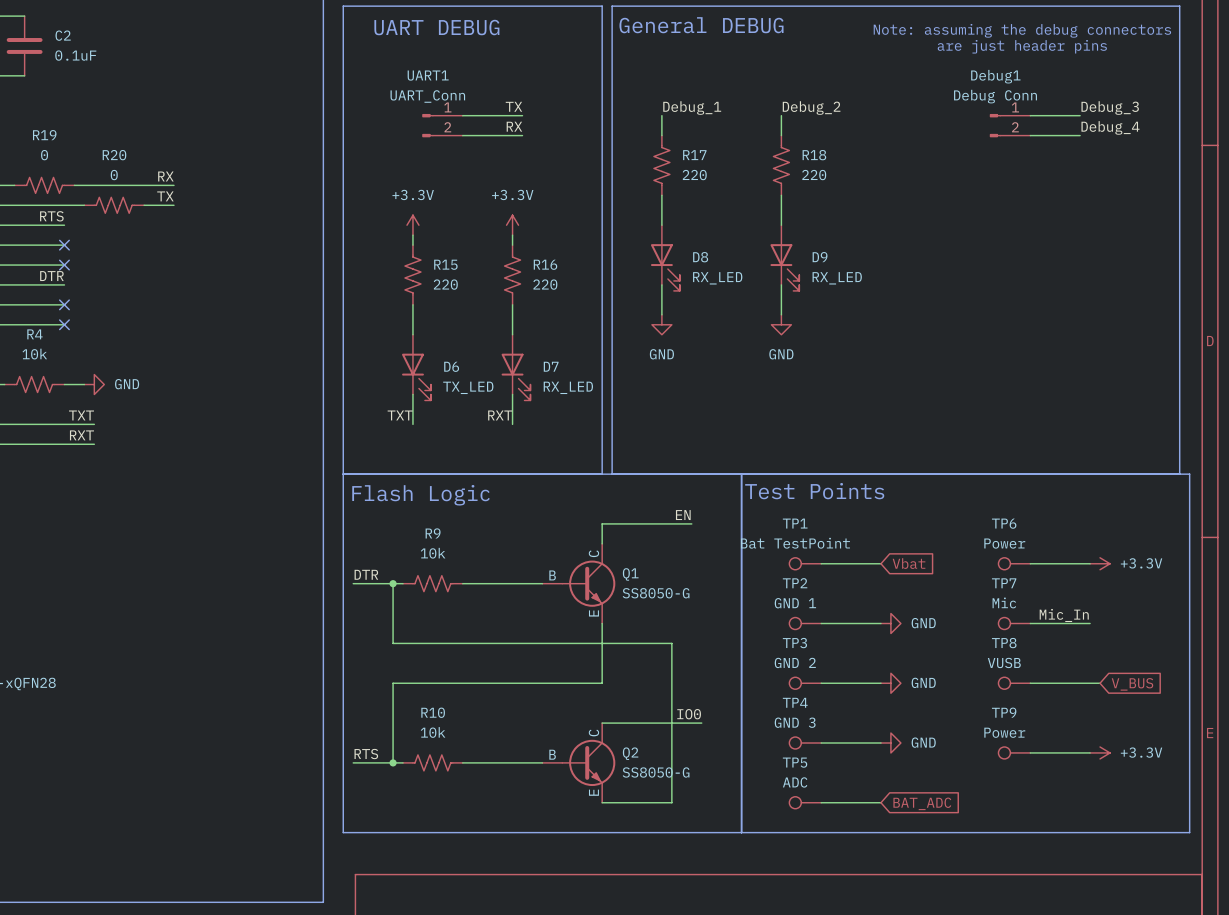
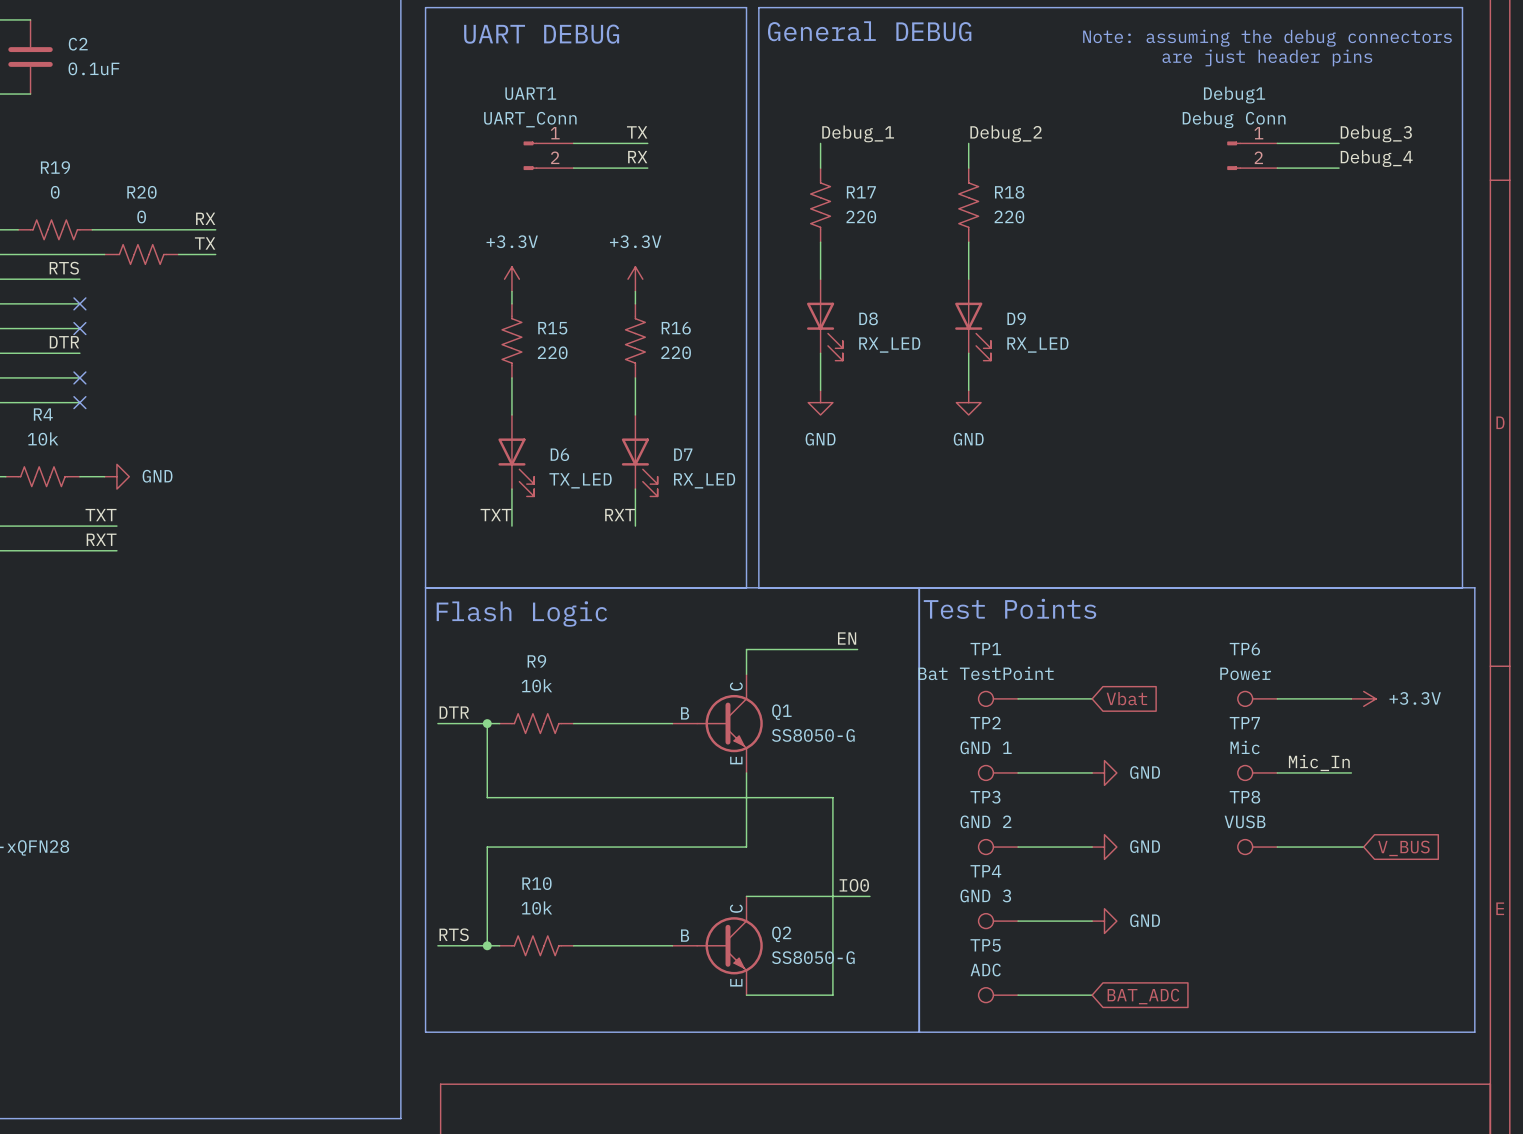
TP9: Power (1014, 752) -> none
wire: (1030, 752) (1090, 752) -> none
power symbol: +3.3V (1100, 752) -> none

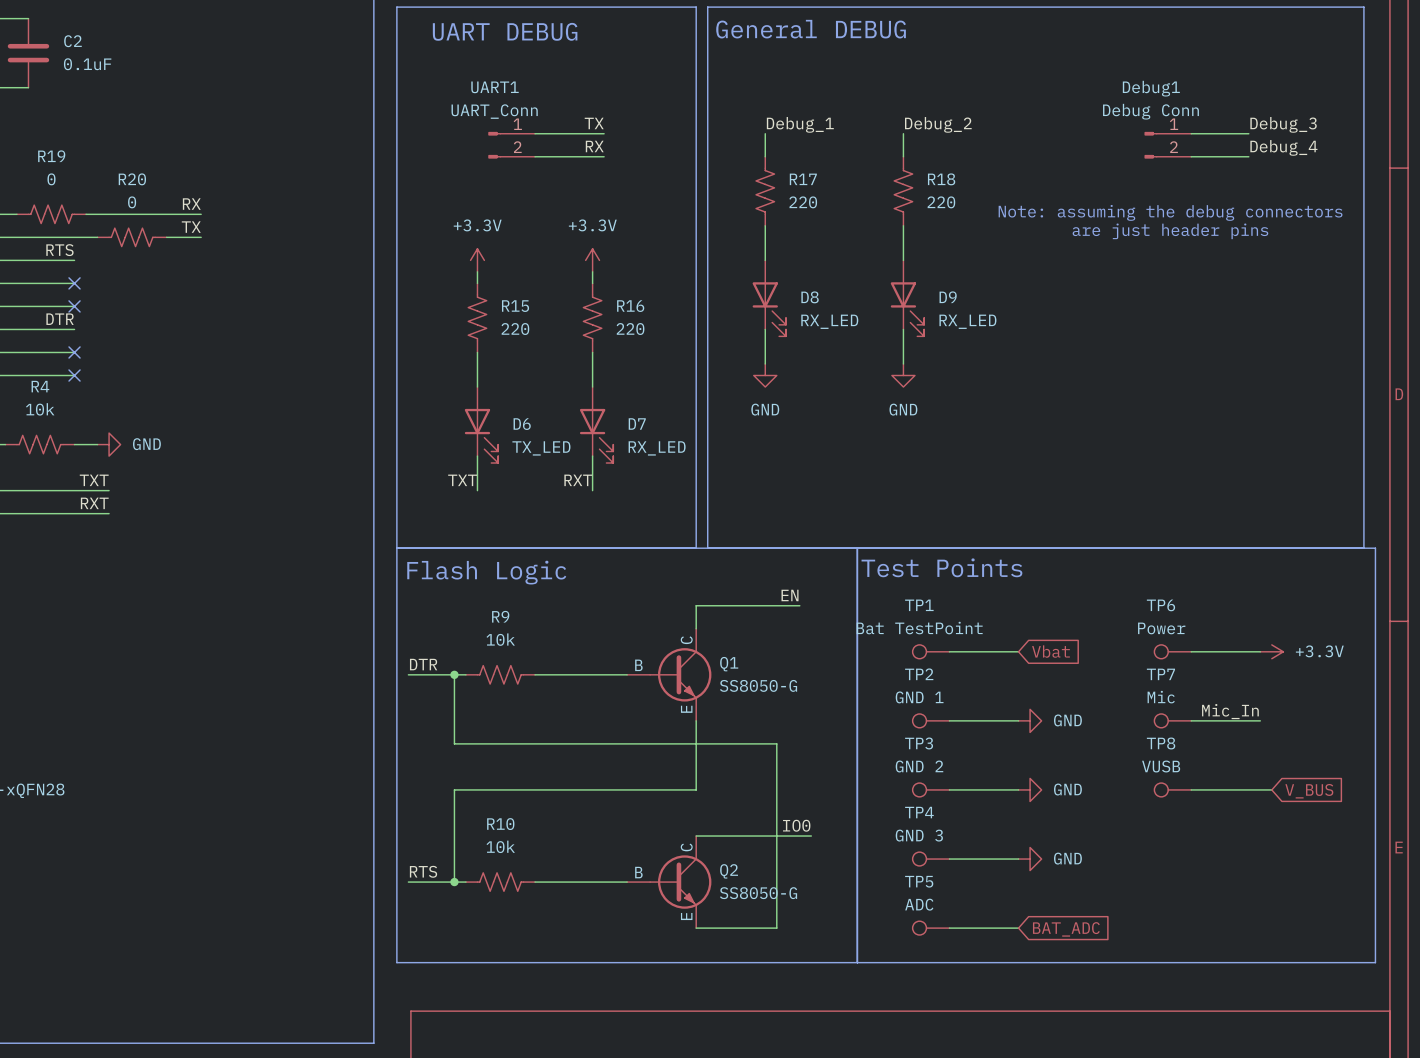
text position: Note: assuming the debug connectors (1267, 38) -> Note: assuming the debug connectors (1170, 212)
text position: are just header pins (1267, 57) -> are just header pins (1170, 231)

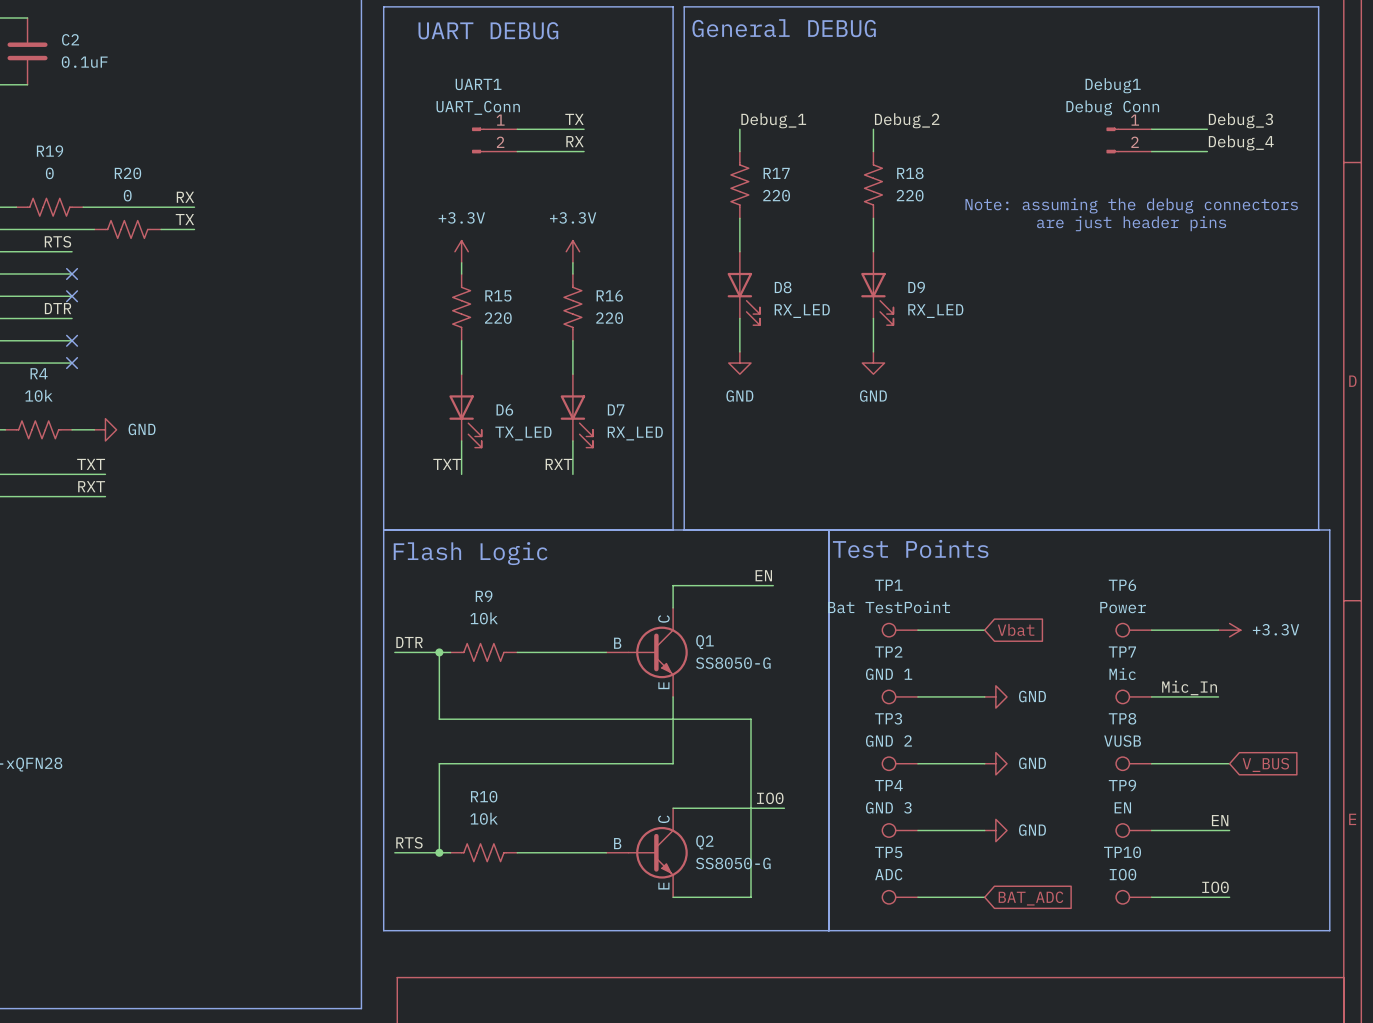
label: none -> EN (1220, 820)
TP9: none -> EN (1133, 830)
wire: none -> (1151, 830) (1229, 830)
label: none -> IO0 (1215, 887)
TP10: none -> IO0 (1133, 897)
wire: none -> (1151, 897) (1229, 897)

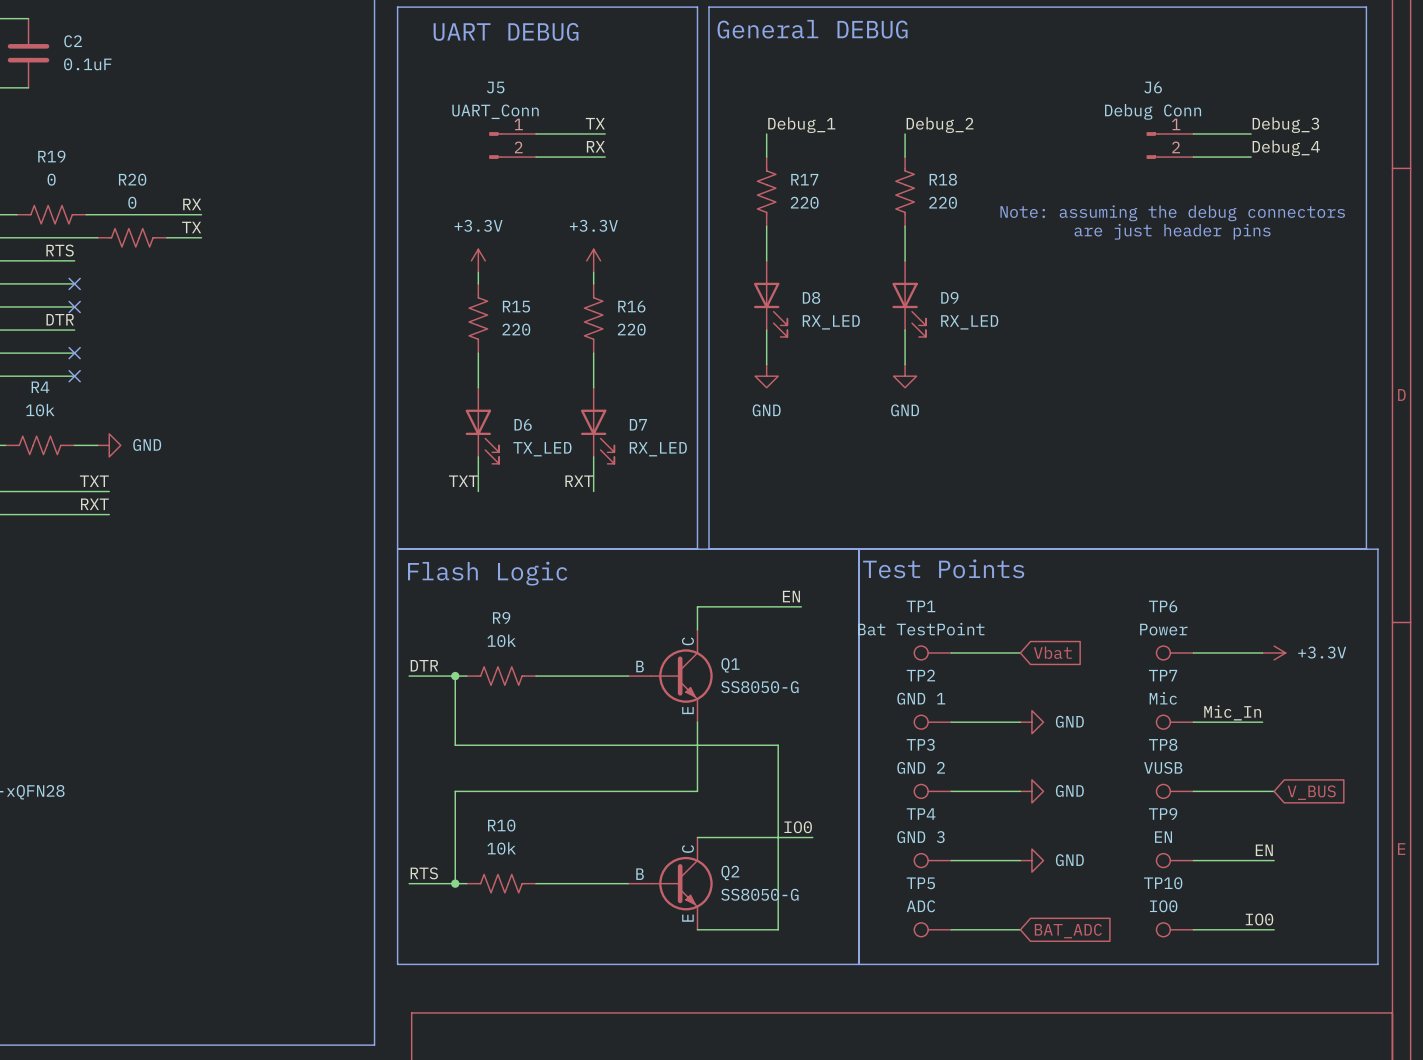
UART1 name: UART1 (478, 84) -> J5 (495, 87)
Debug1 name: Debug1 (1113, 85) -> J6 (1153, 87)

